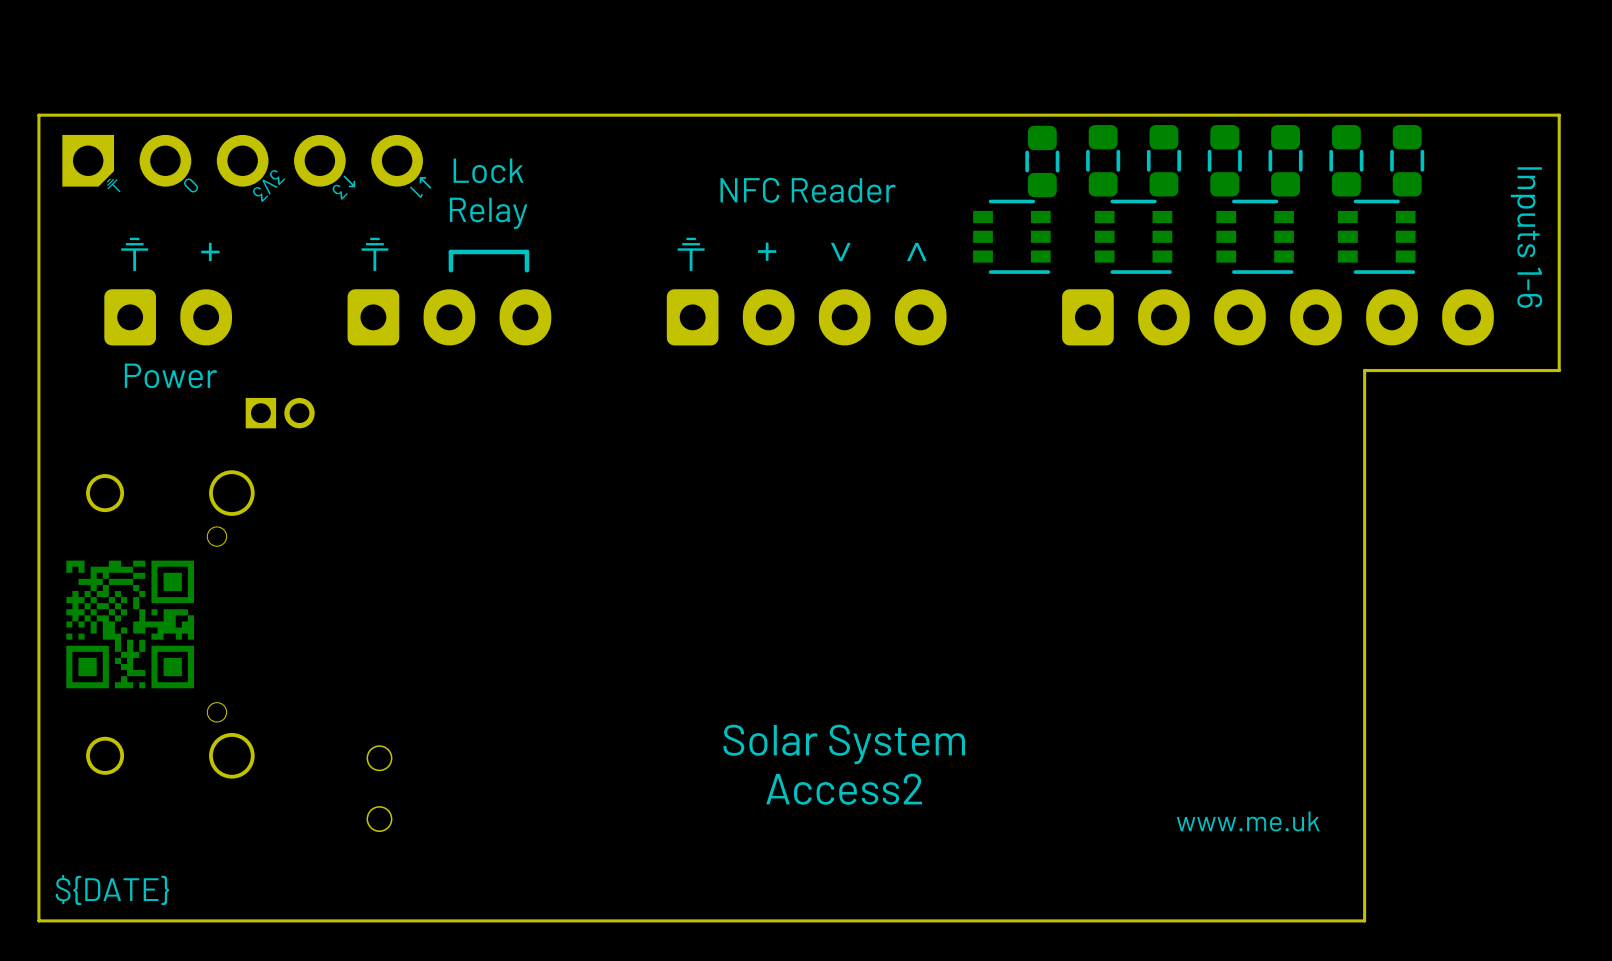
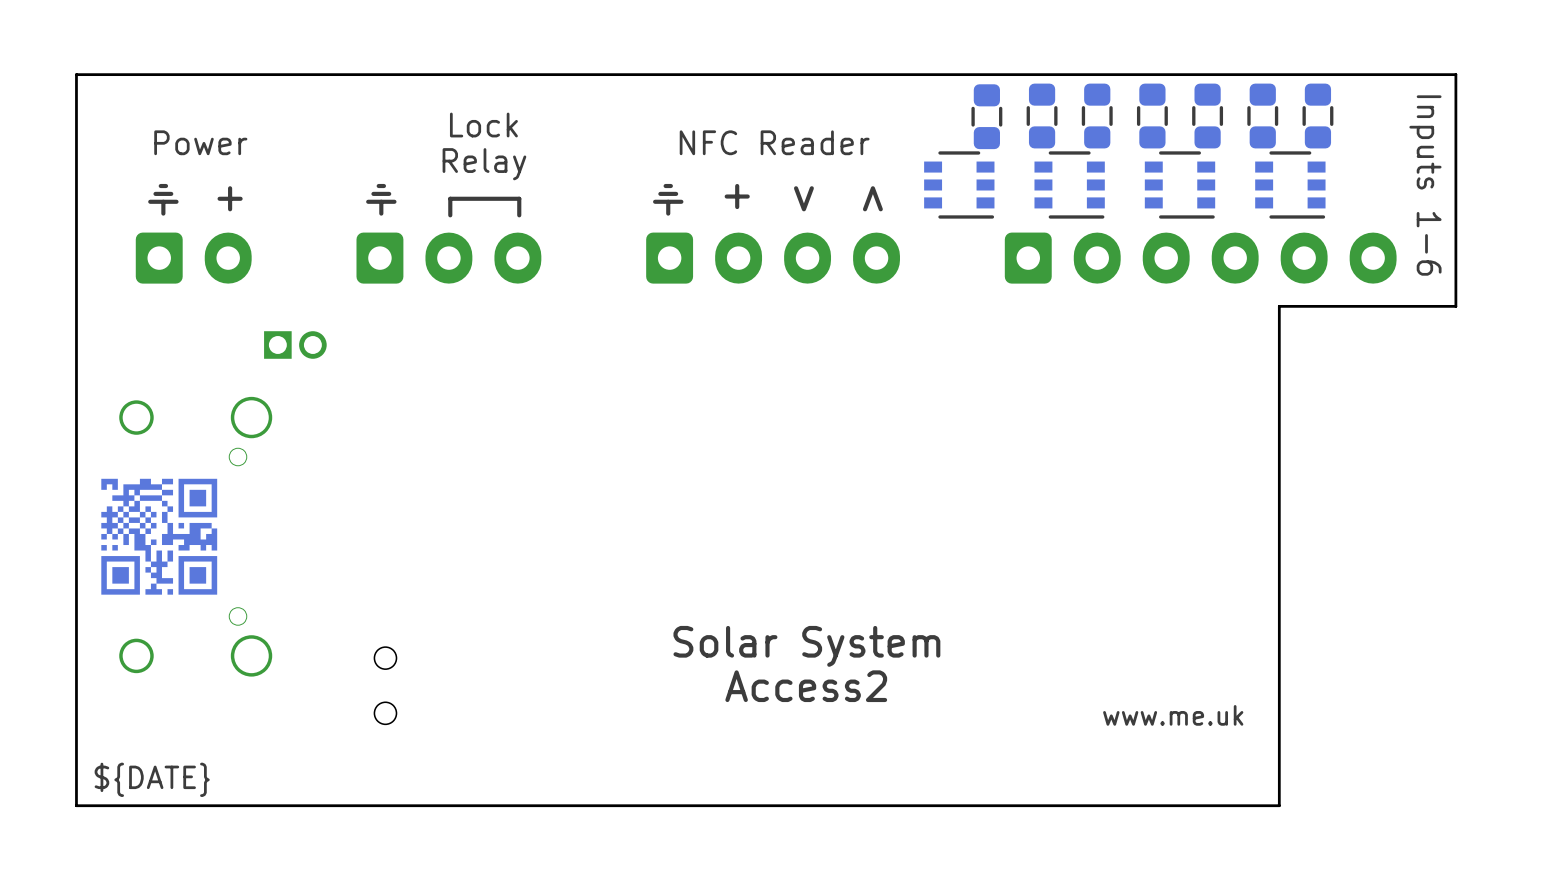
part: (242, 160) -> none
text position: Power (170, 375) -> Power (200, 142)

